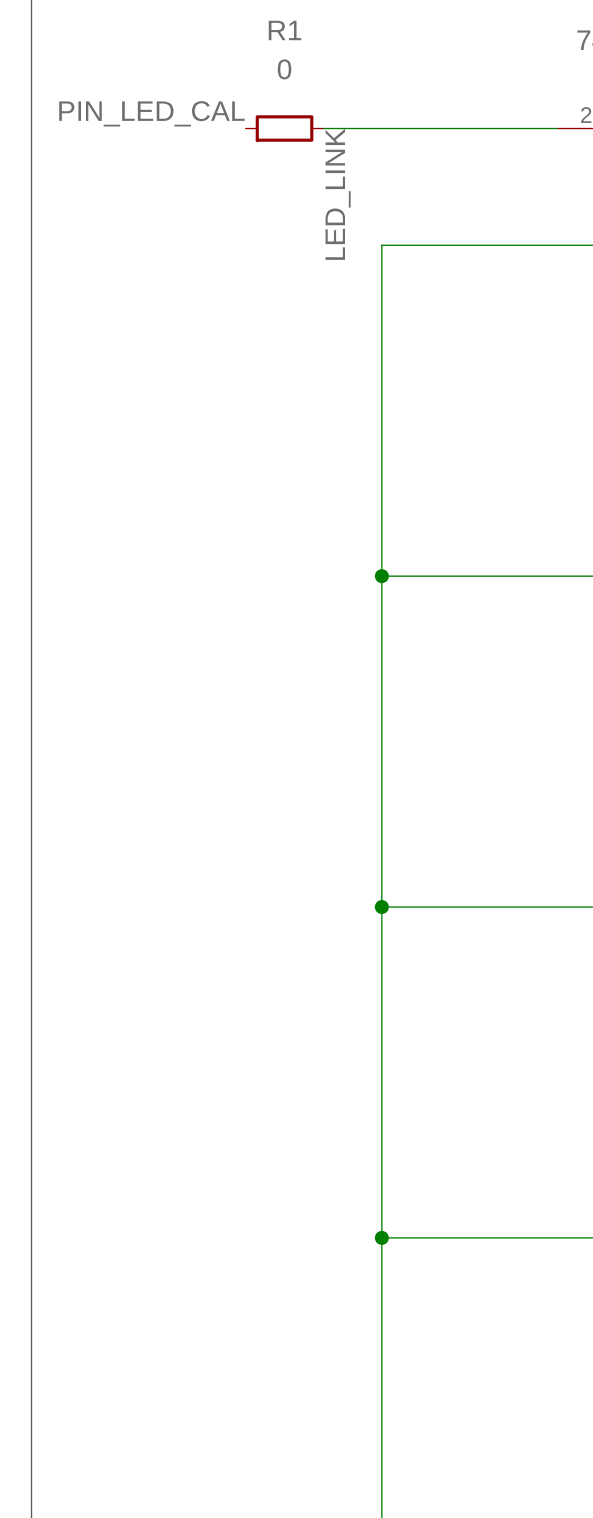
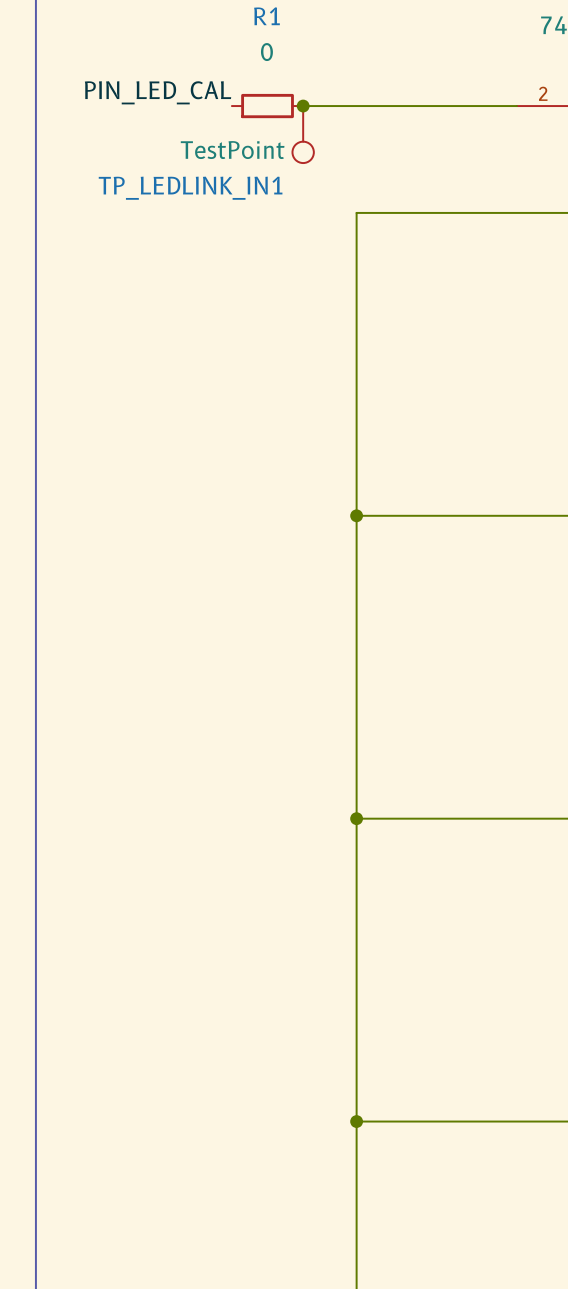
junction: none -> (303, 106)
TP_LEDLINK_IN1: none -> TestPoint (303, 134)
label: LED_LINK (338, 194) -> none

